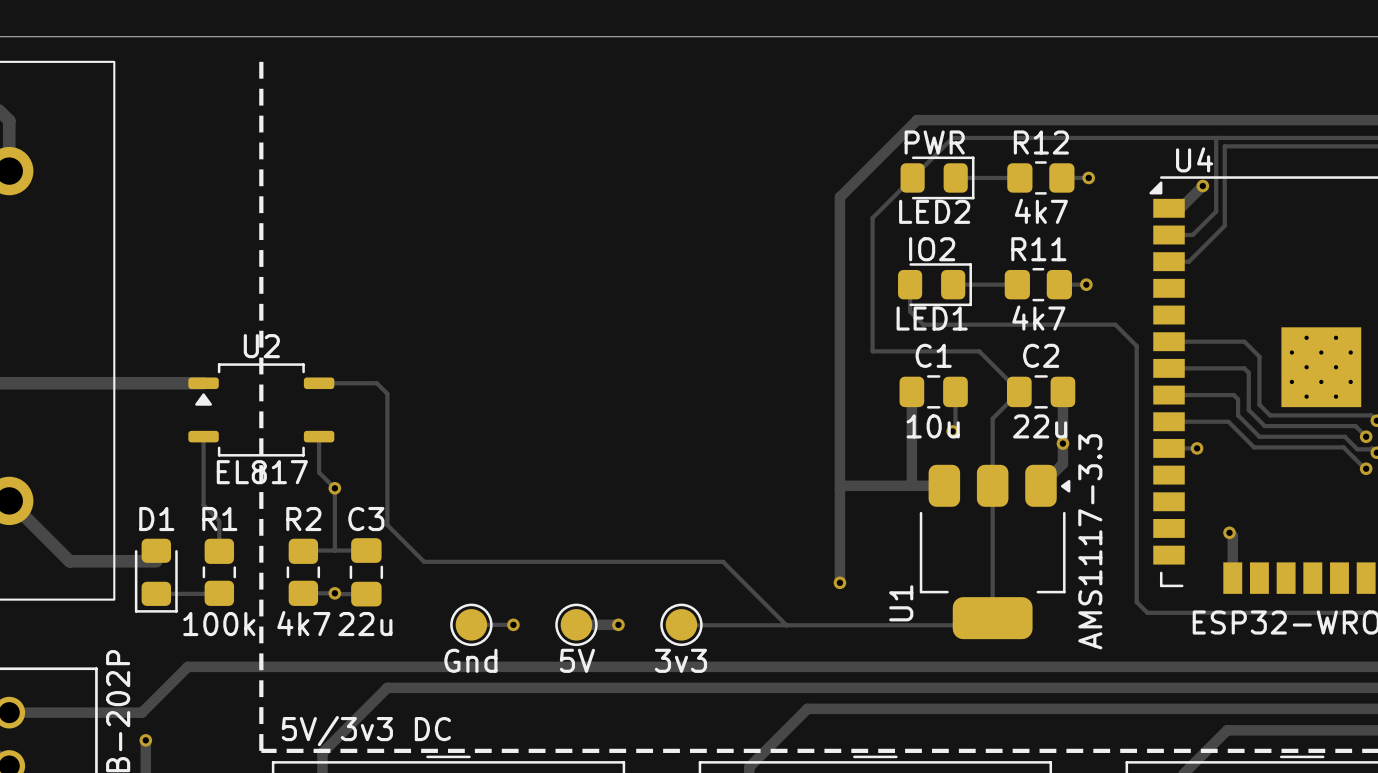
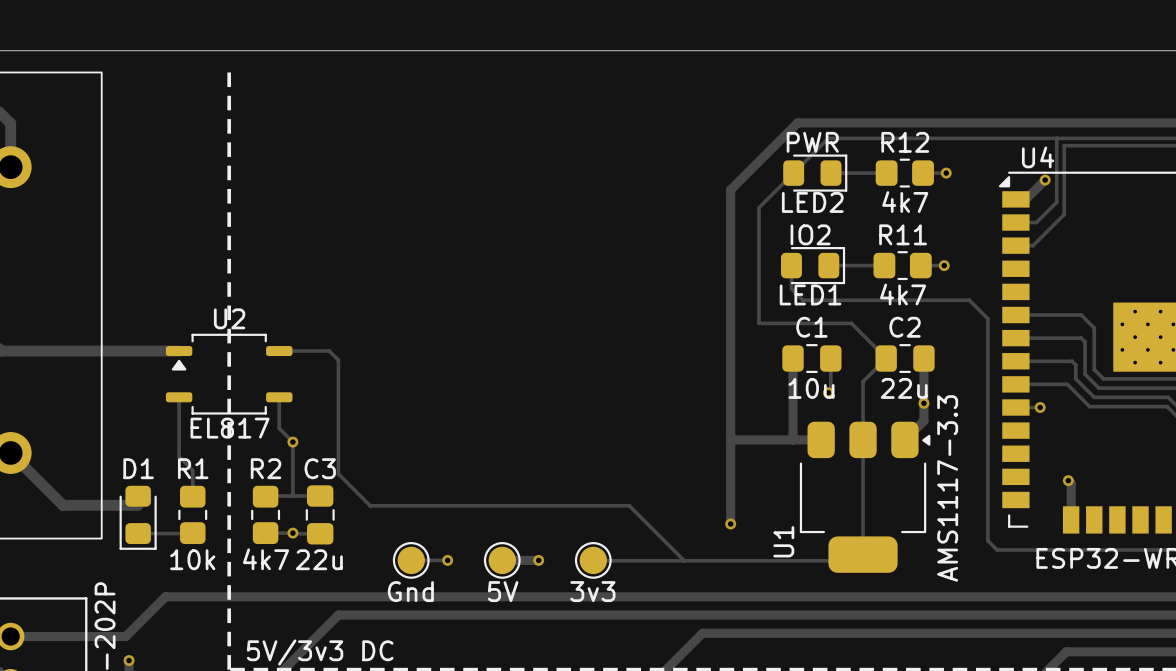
R1 value: 100k (219, 624) -> 10k (192, 559)

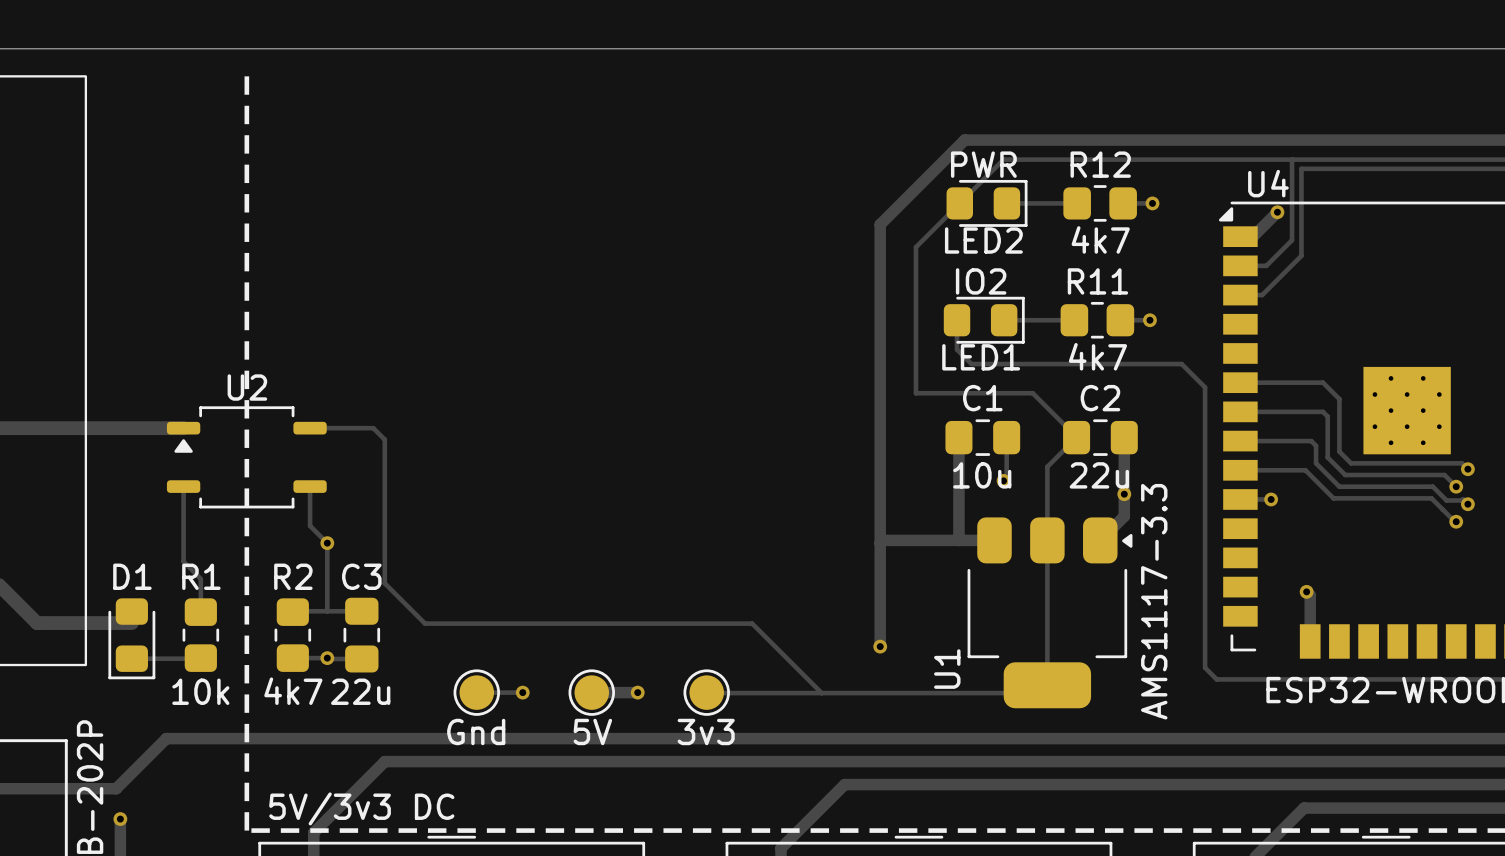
U2 value: EL817 (230, 428) -> none

